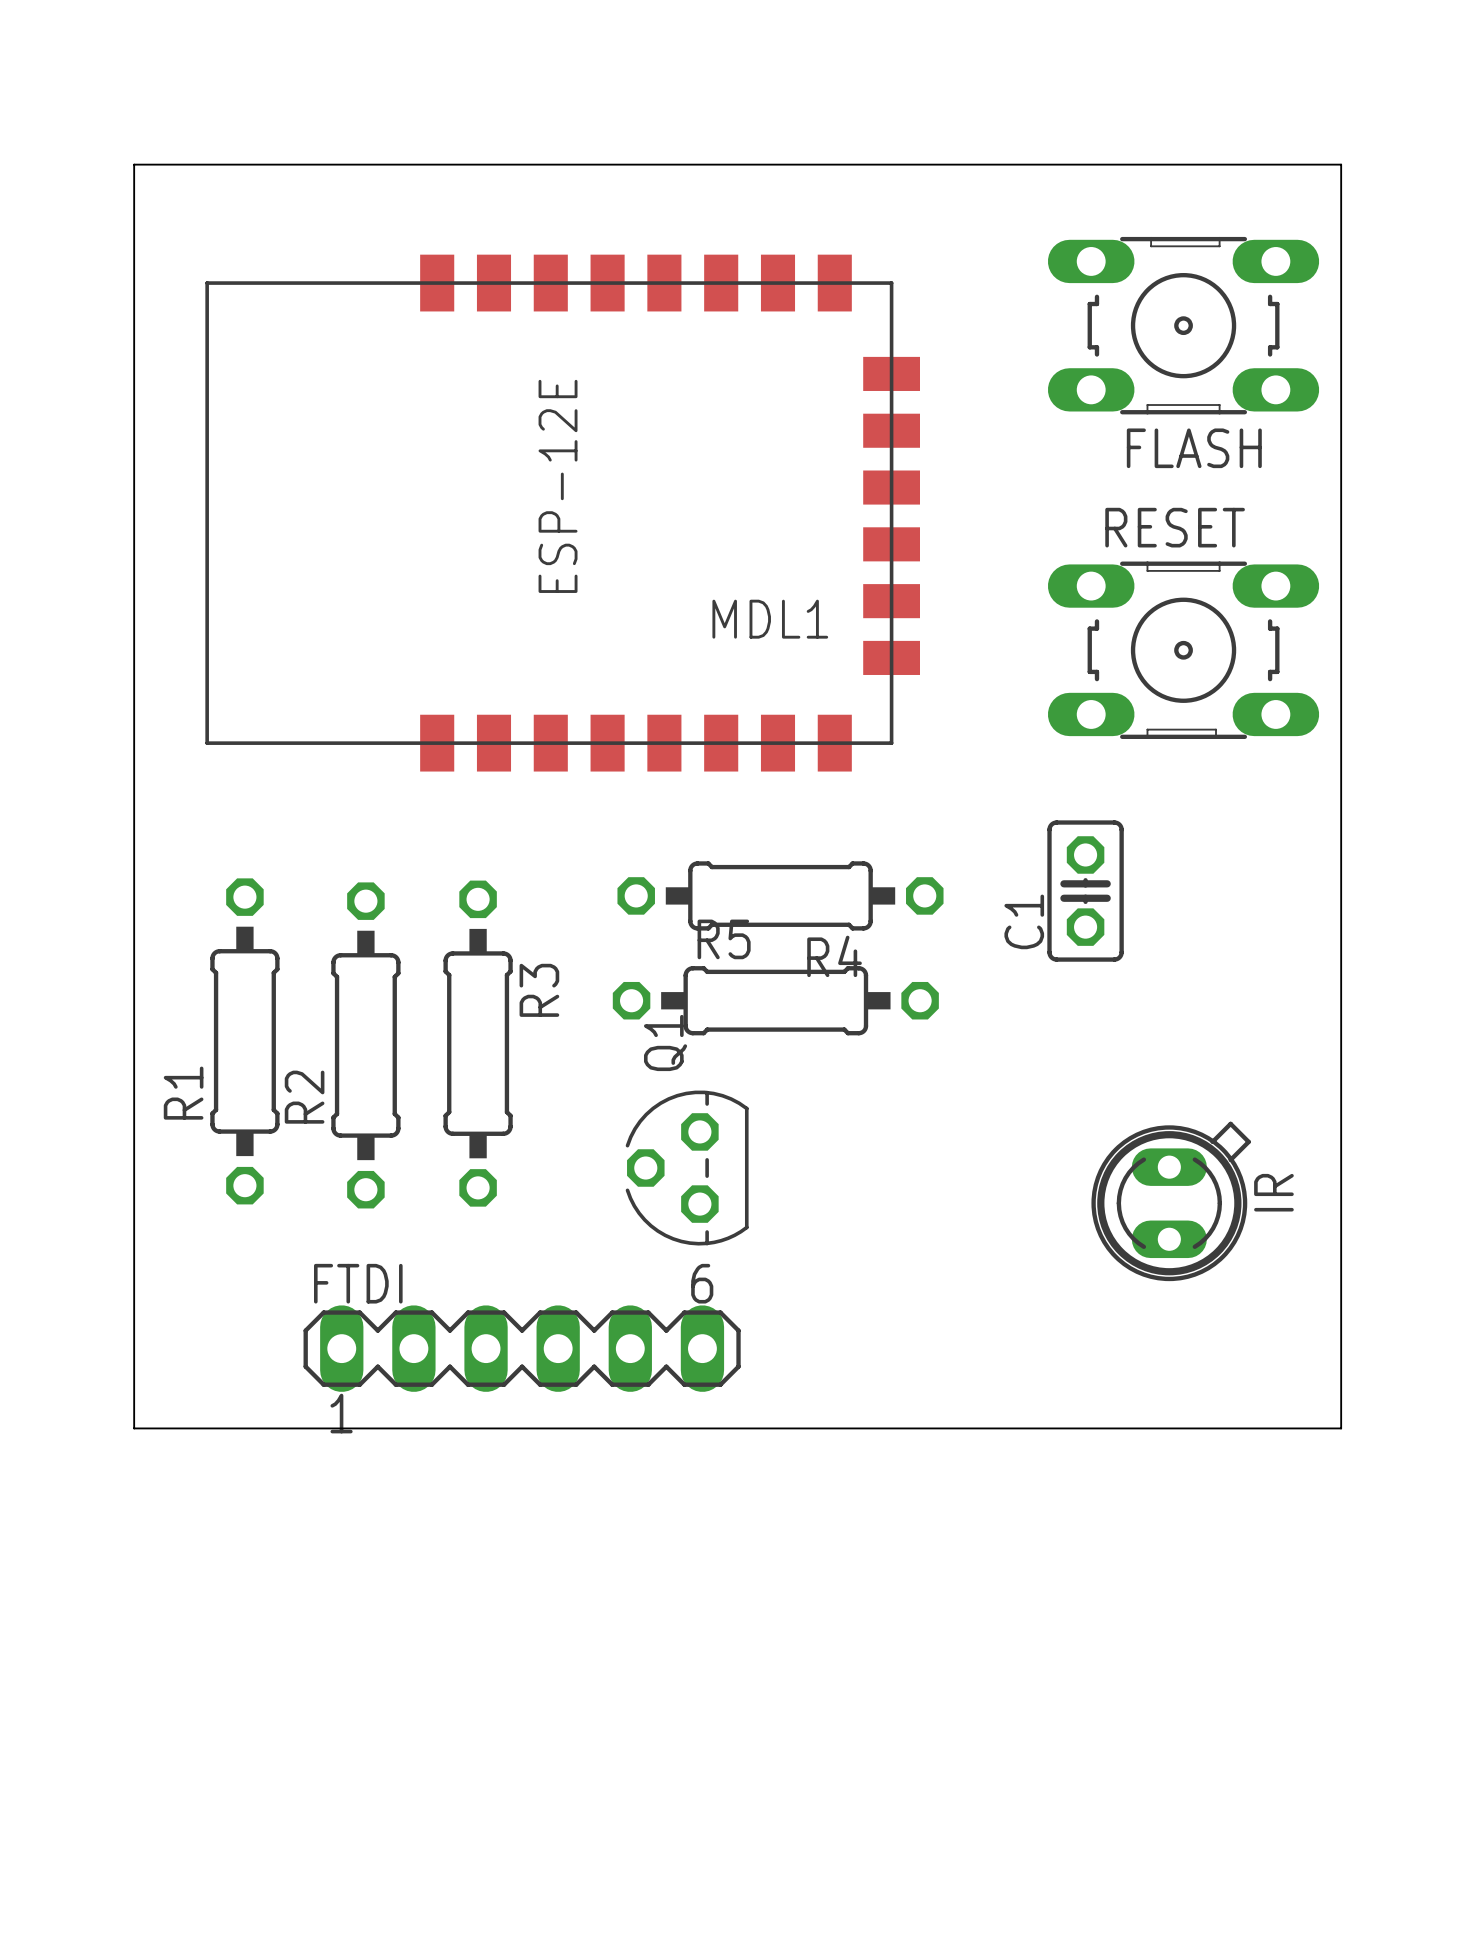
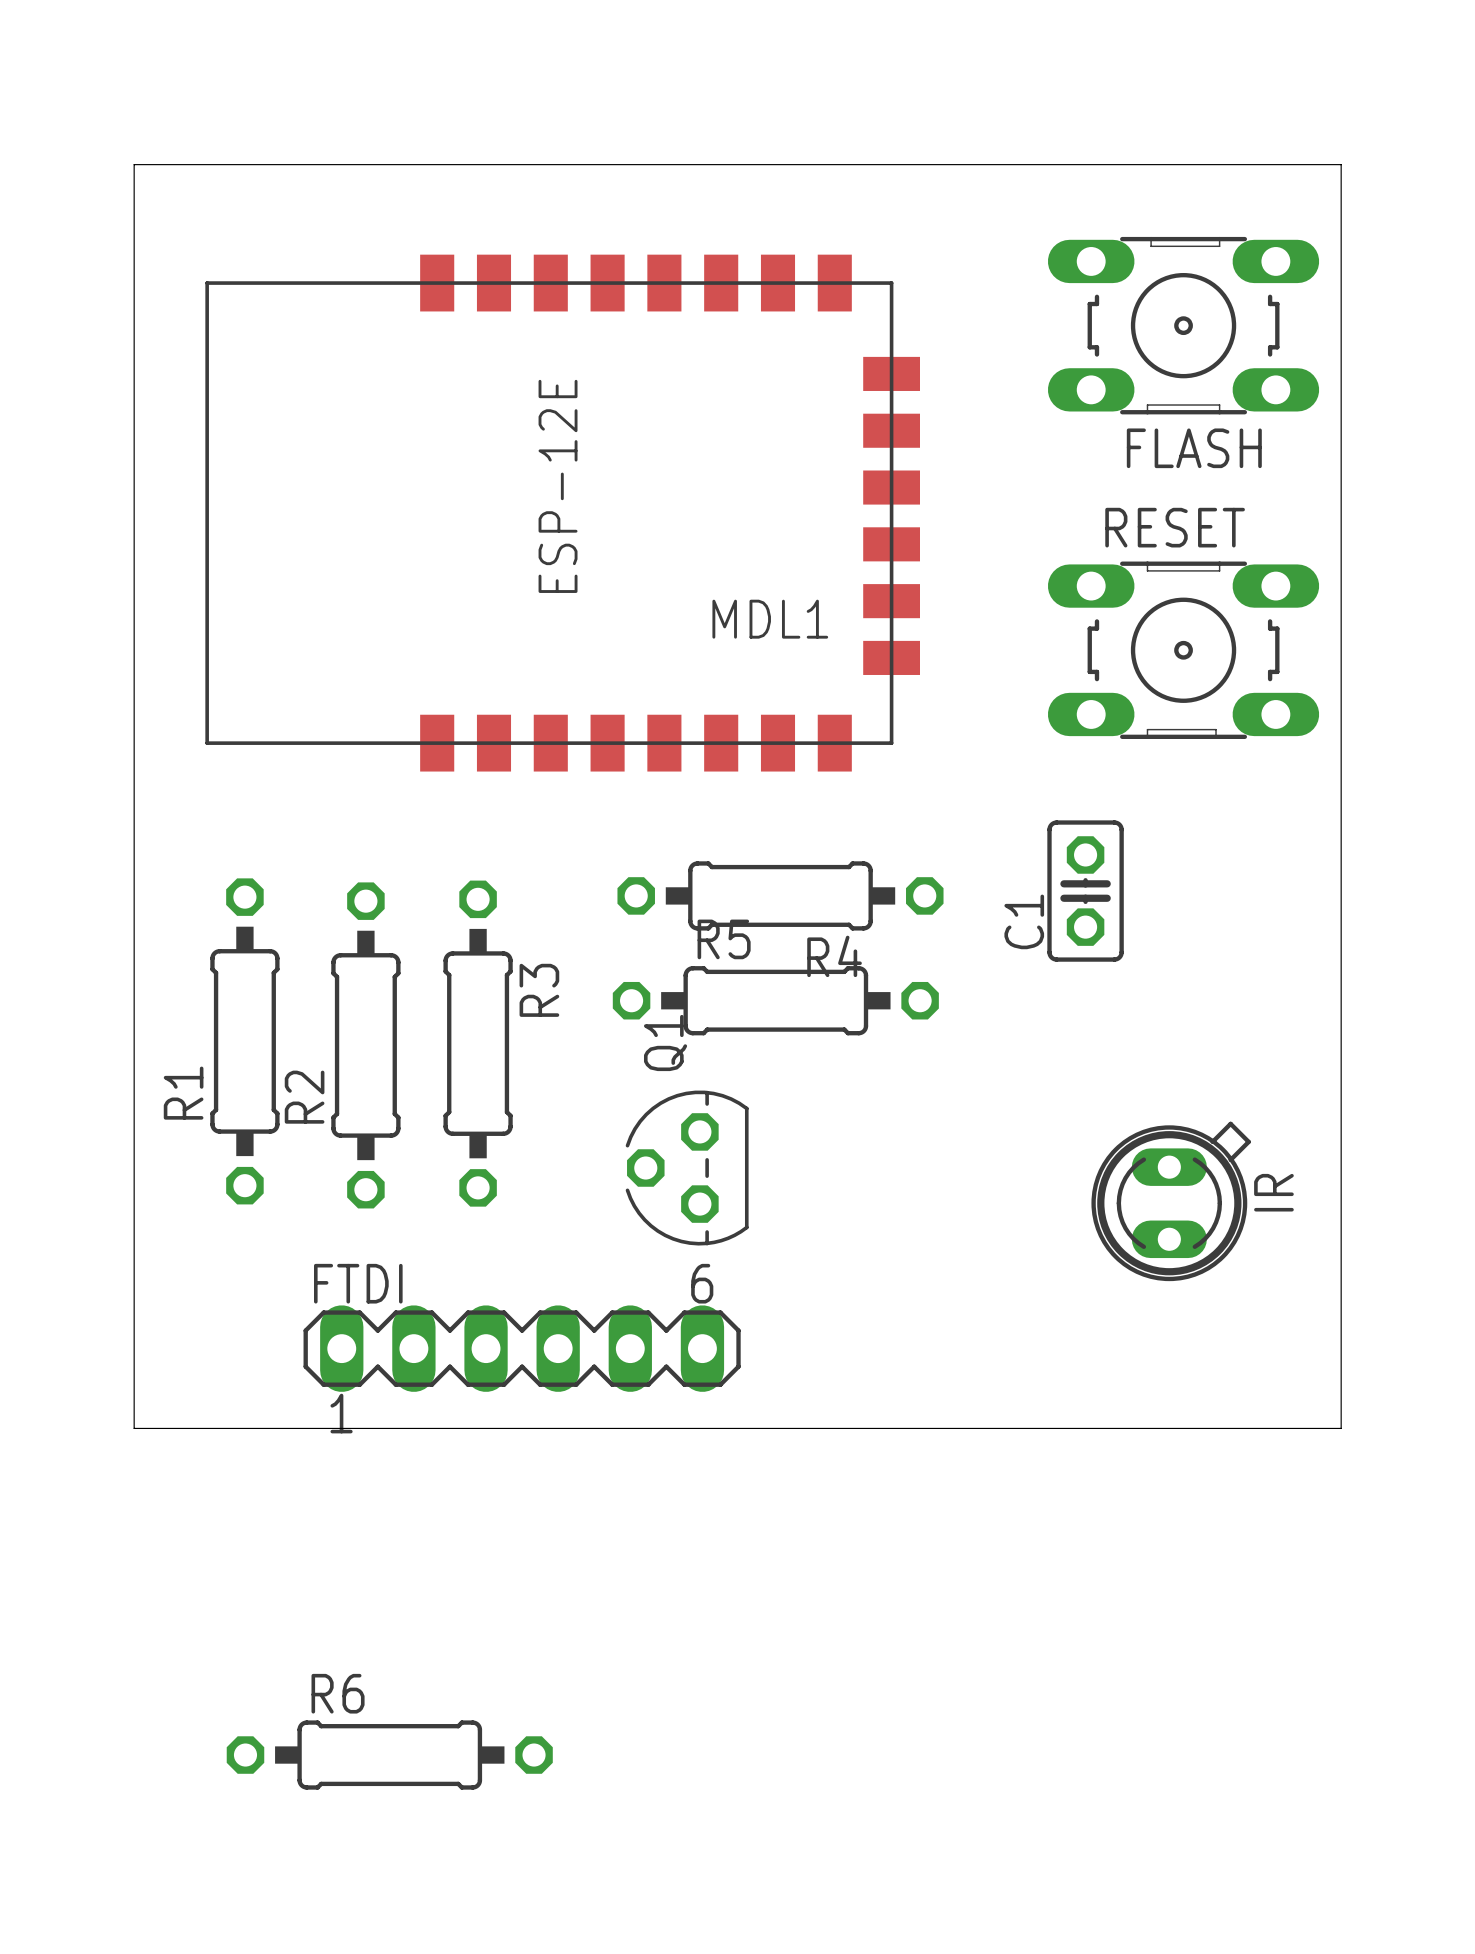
R6: none -> (389, 1755)

